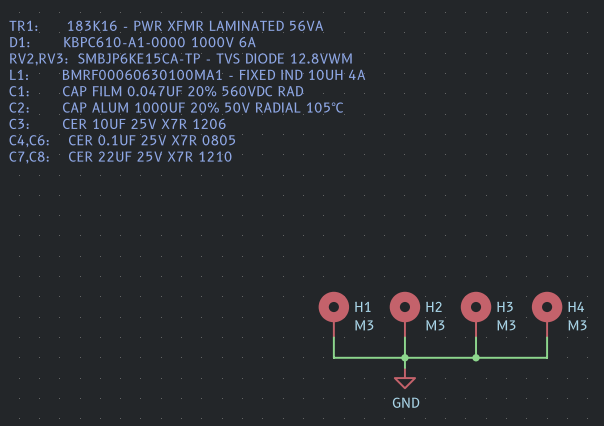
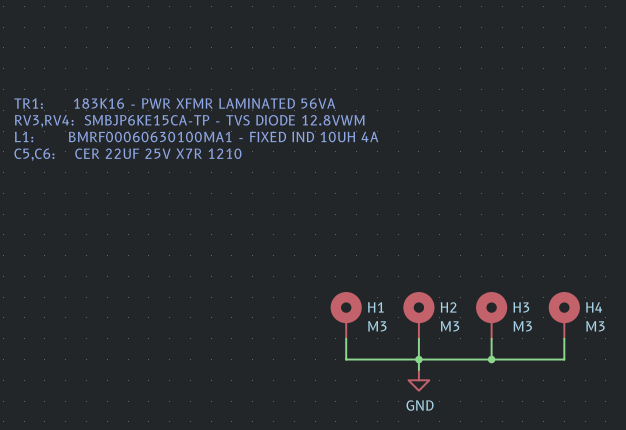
text: TR1: 183K16 - PWR XFMR LAMINATED 56VA (166, 25) -> none
text: D1: KBPC610-A1-0000 1000V 6A (132, 42) -> none
text: RV2,RV3: SMBJP6KE15CA-TP - TVS DIODE 12.8VWM (180, 59) -> none
text: L1: BMRF00060630100MA1 - FIXED IND 10UH 4A (187, 74) -> none
text: C1: CAP FILM 0.047UF 20% 560VDC RAD (156, 91) -> none
text: C2: CAP ALUM 1000UF 20% 50V RADIAL 105°C (176, 107) -> TR1: 183K16 - PWR XFMR LAMINATED 56VA (174, 103)
text: C3: CER 10UF 25V X7R 1206 (117, 123) -> RV3,RV4: SMBJP6KE15CA-TP - TVS DIODE 12.8VWM (189, 121)
text: C4,C6: CER 0.1UF 25V X7R 0805 (122, 141) -> L1: BMRF00060630100MA1 - FIXED IND 10UH 4A (196, 137)
text: C7,C8: CER 22UF 25V X7R 1210 (120, 157) -> C5,C6: CER 22UF 25V X7R 1210 (127, 154)

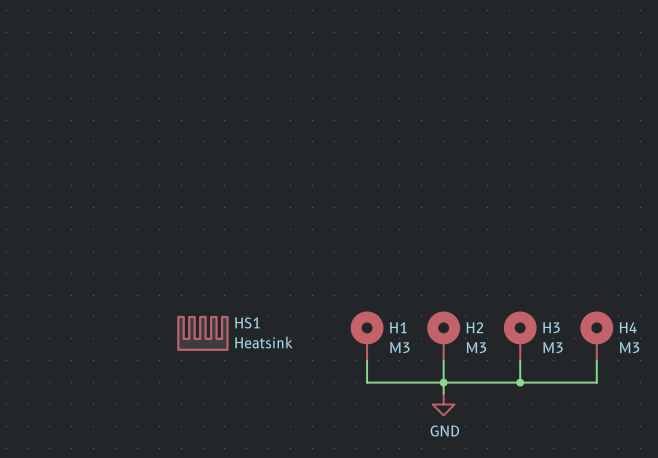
text: TR1: 183K16 - PWR XFMR LAMINATED 56VA (174, 103) -> none
text: RV3,RV4: SMBJP6KE15CA-TP - TVS DIODE 12.8VWM (189, 121) -> none
text: L1: BMRF00060630100MA1 - FIXED IND 10UH 4A (196, 137) -> none
text: C5,C6: CER 22UF 25V X7R 1210 (127, 154) -> none
HS1: none -> Heatsink (202, 333)

